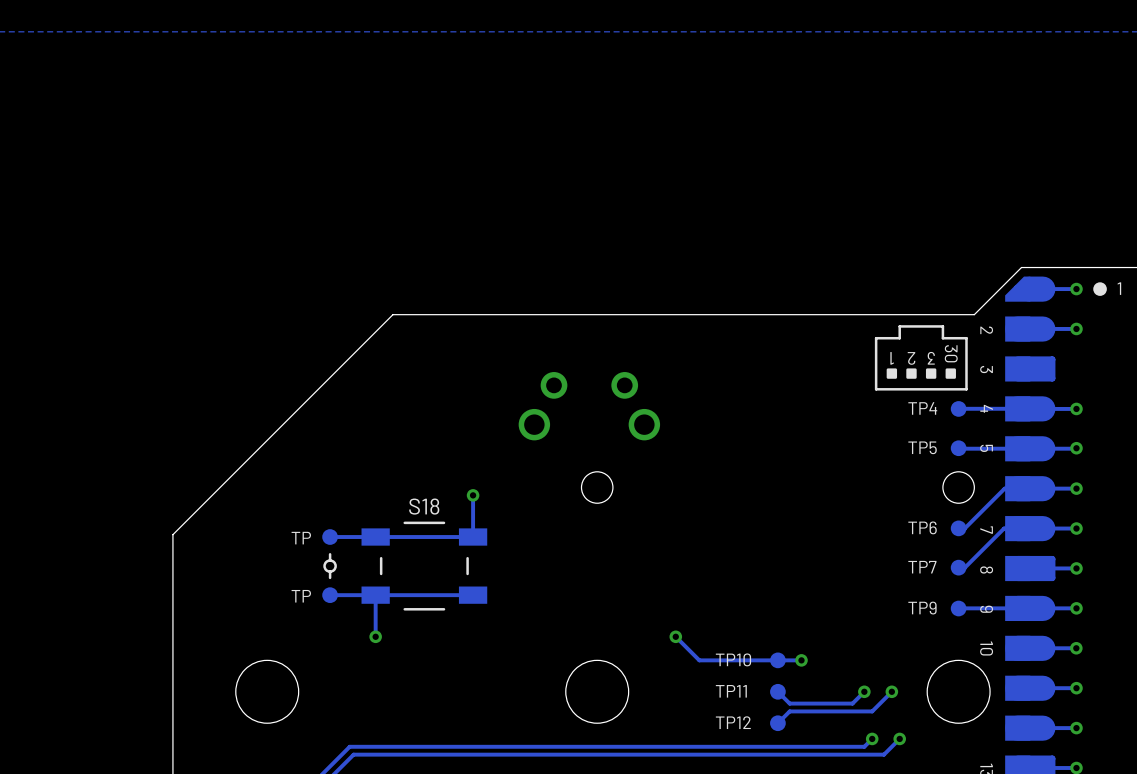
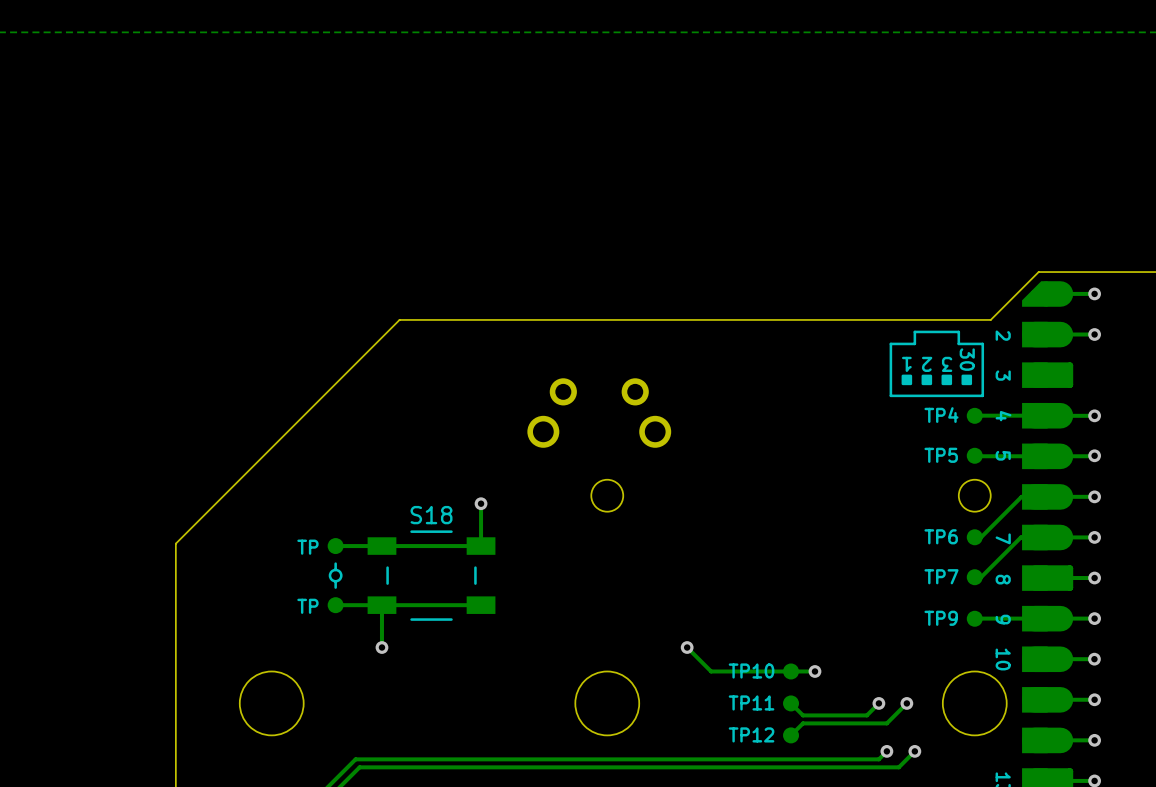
drawing: [1093, 282, 1107, 296] -> none
text: 1 (1119, 288) -> none

